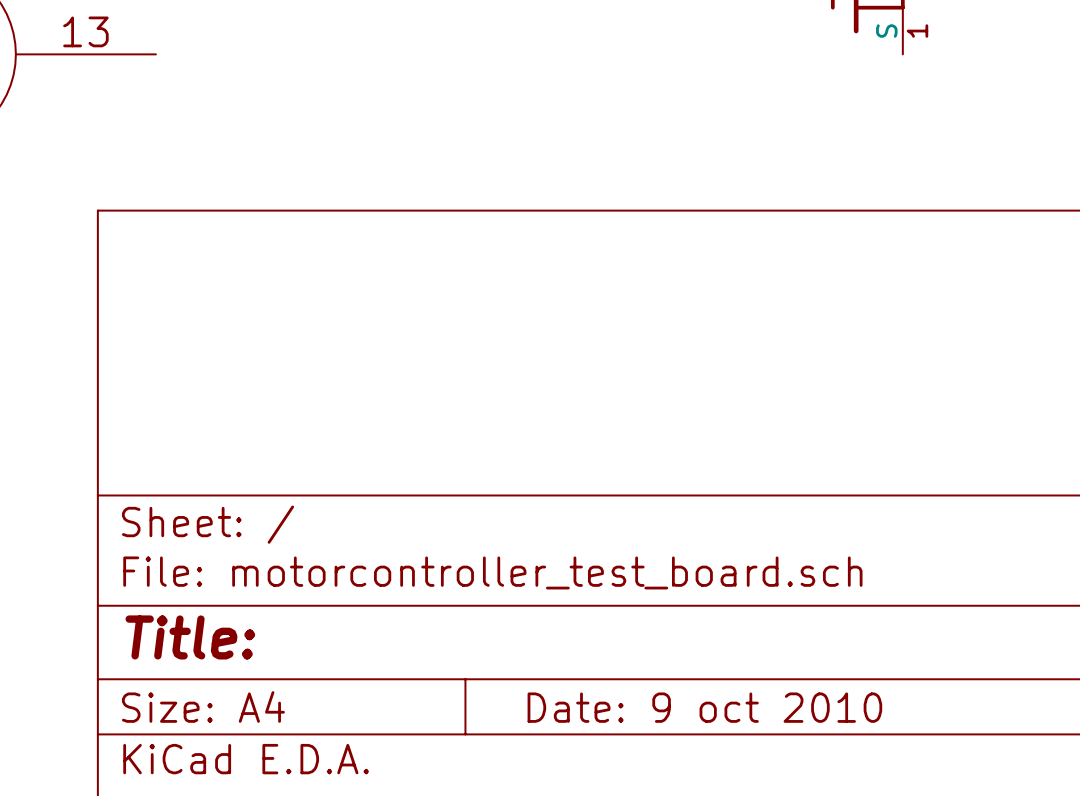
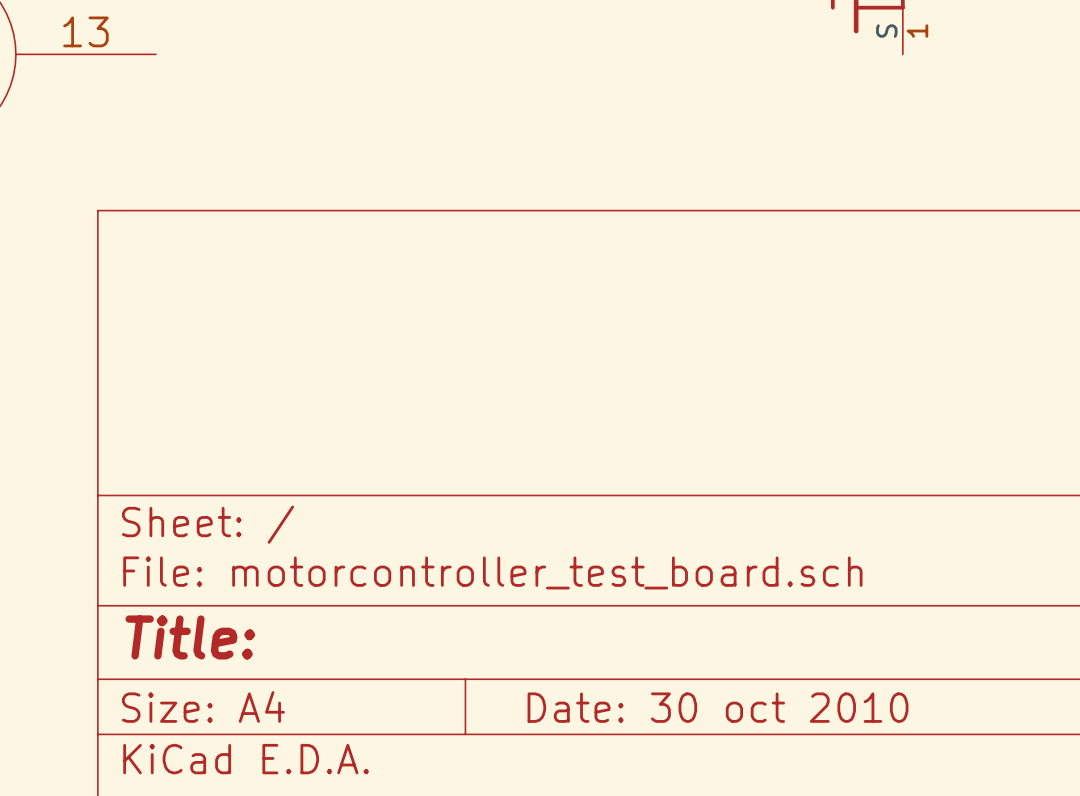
title block: Date: 9 oct 2010 (704, 707) -> Date: 30 oct 2010 (718, 707)

